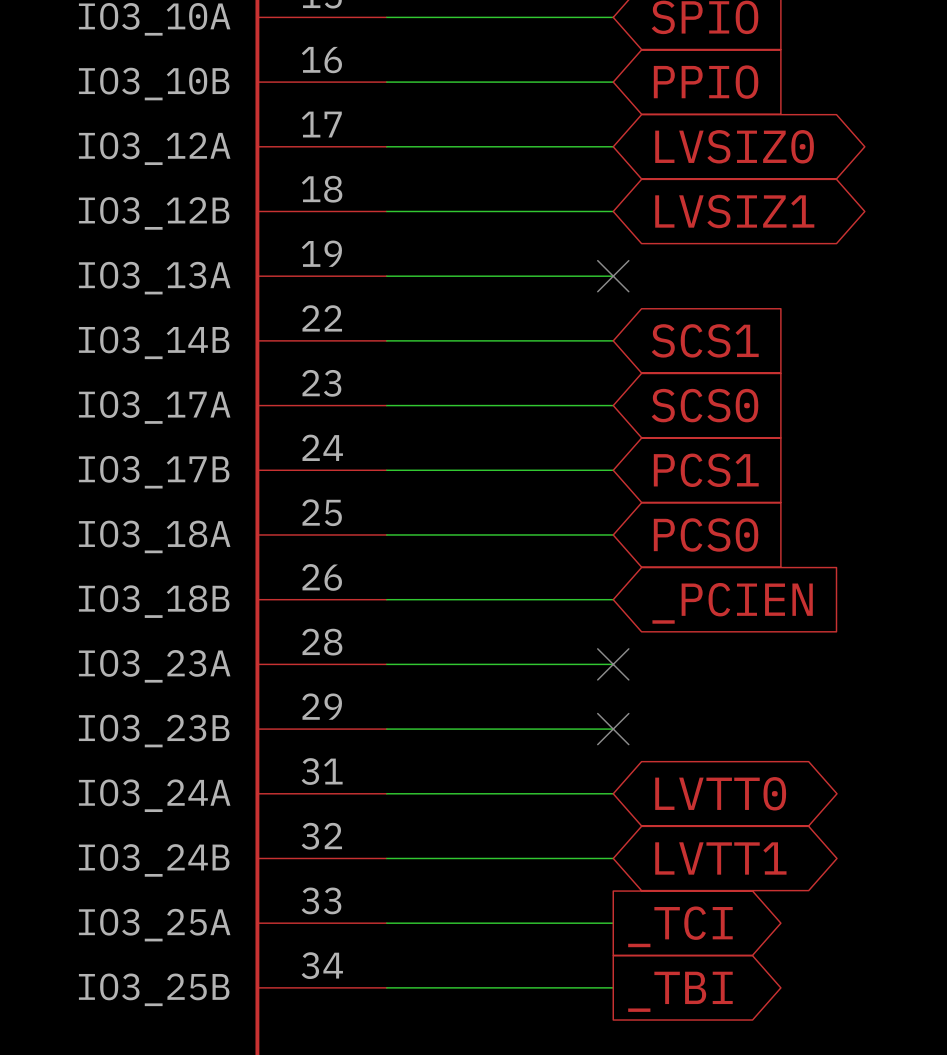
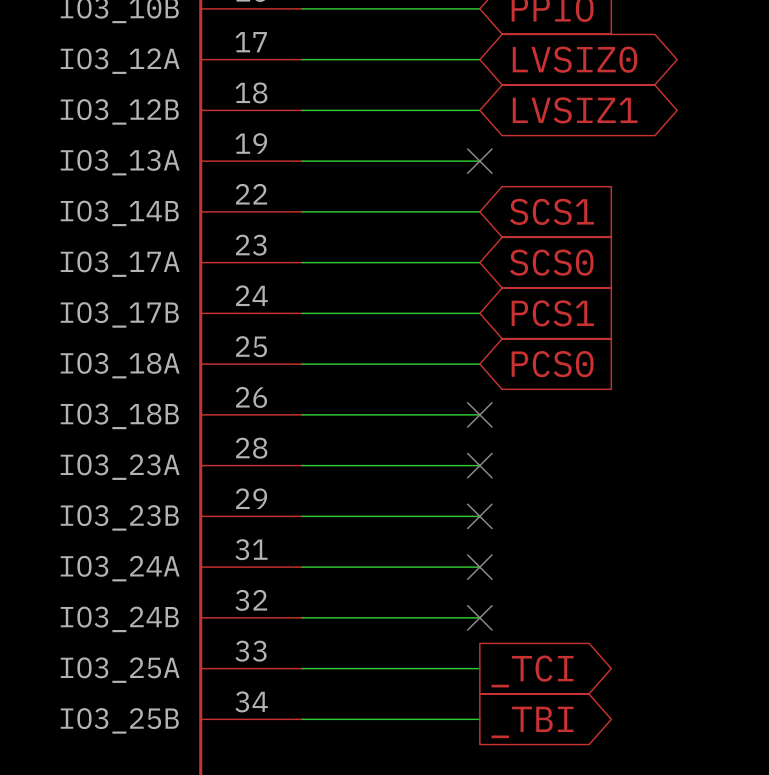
no-connect mark: none -> (479, 414)
global label: _PCIEN (732, 603) -> none
no-connect mark: none -> (479, 567)
global label: LVTT0 (720, 793) -> none
no-connect mark: none -> (479, 617)
global label: LVTT1 (720, 858) -> none

